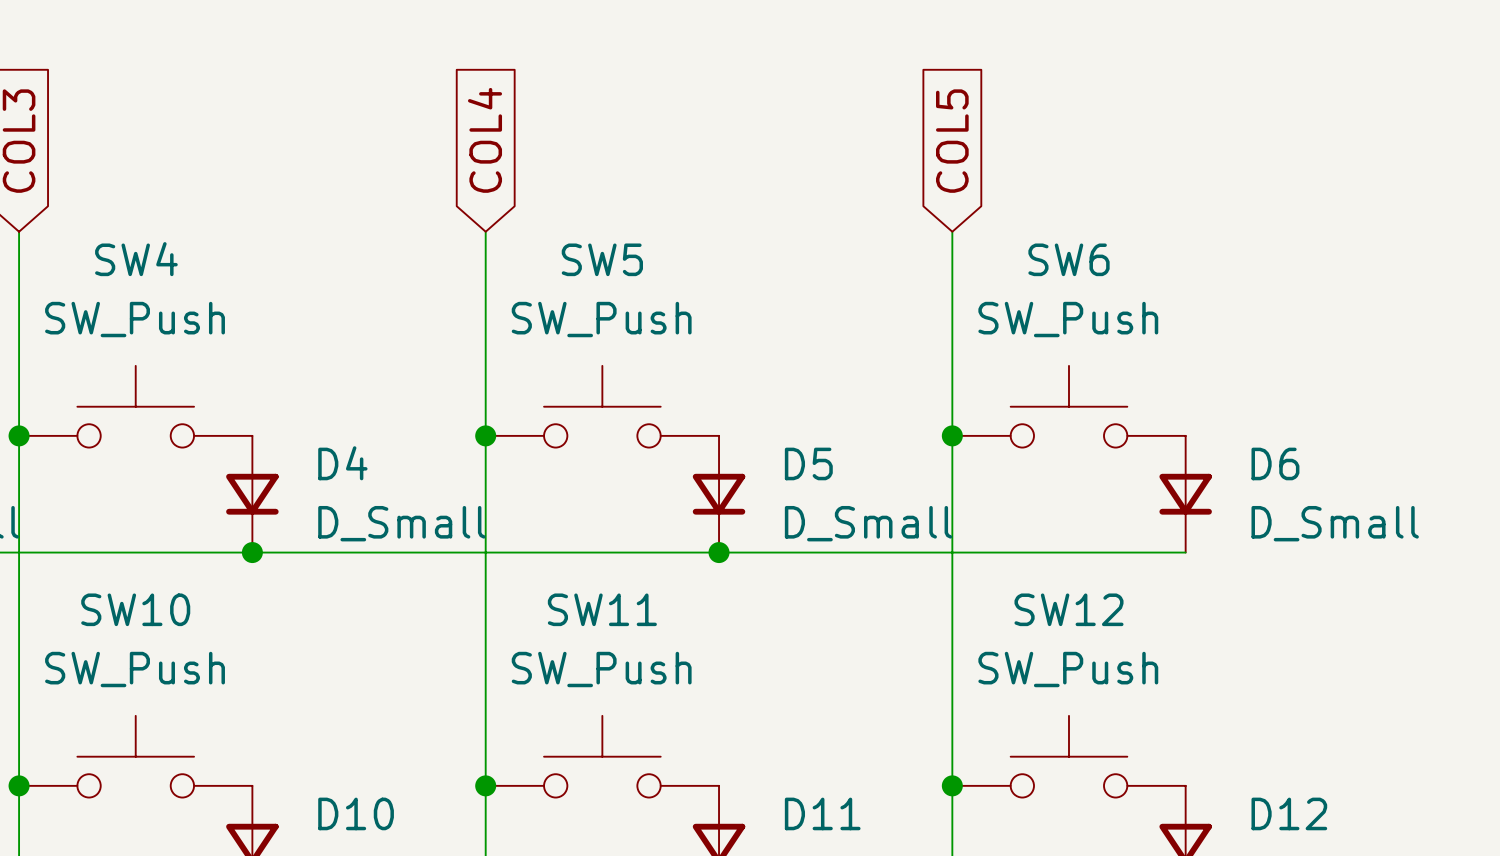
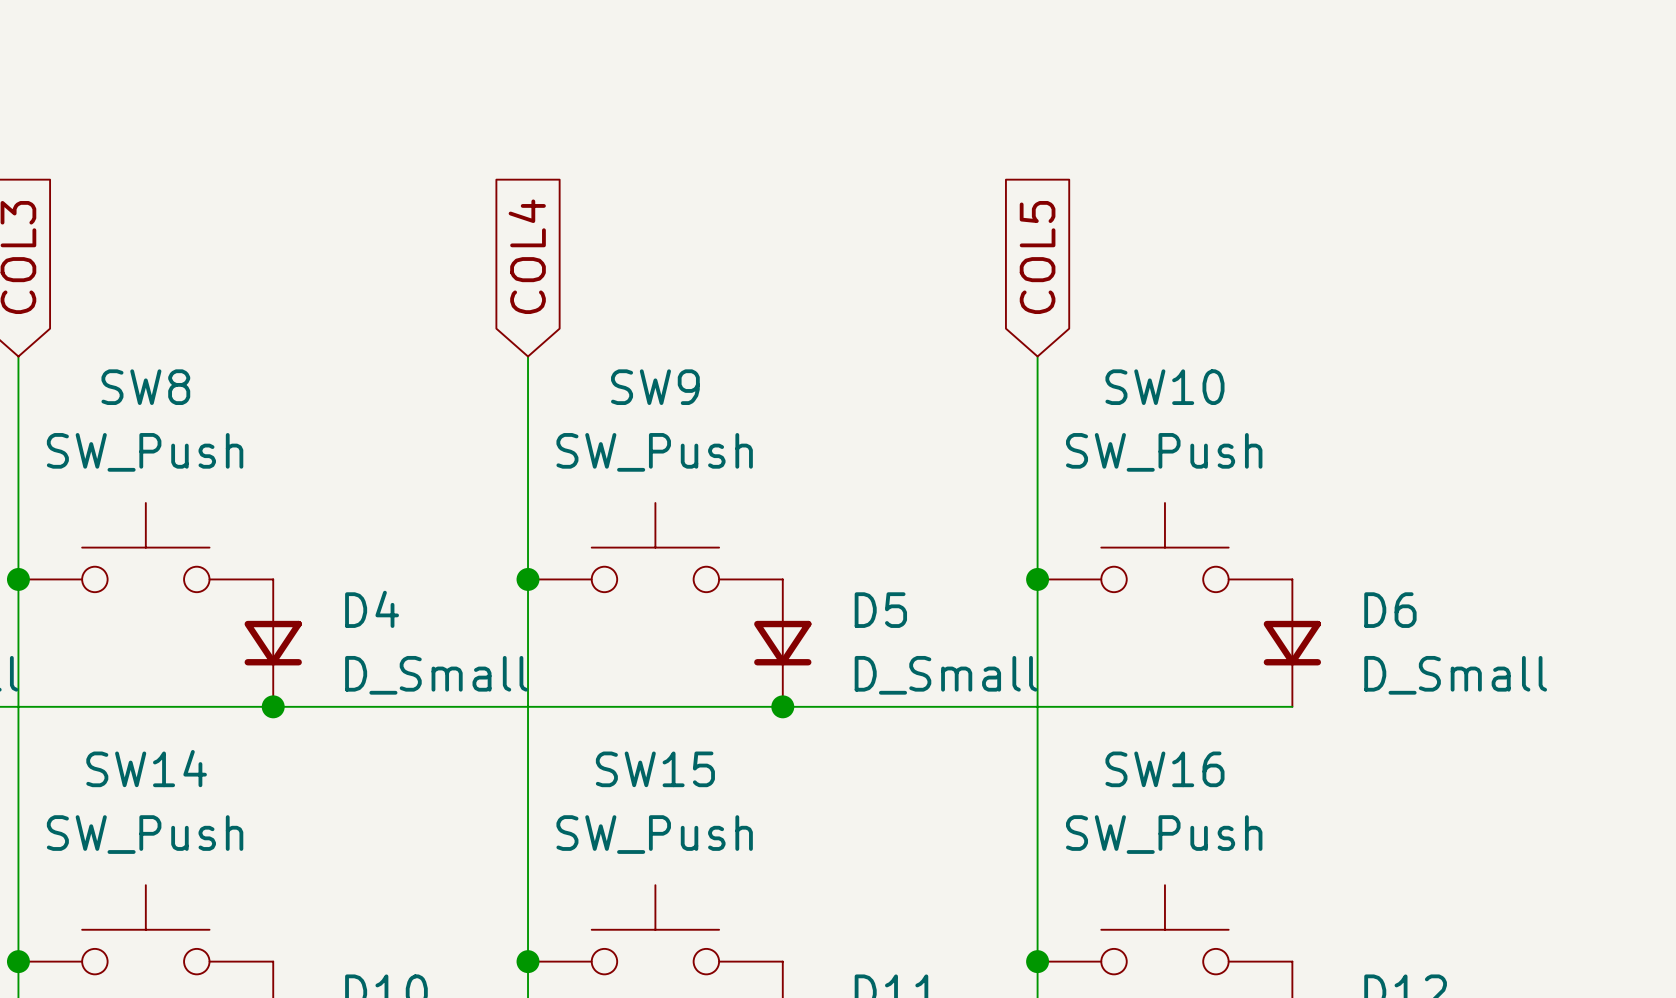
SW4 name: SW4 (136, 259) -> SW8 (145, 387)
SW5 name: SW5 (602, 259) -> SW9 (655, 387)
SW6 name: SW6 (1069, 259) -> SW10 (1164, 387)
SW10 name: SW10 (135, 609) -> SW14 (146, 768)
SW11 name: SW11 (602, 609) -> SW15 (655, 769)
SW12 name: SW12 (1069, 609) -> SW16 (1164, 769)

